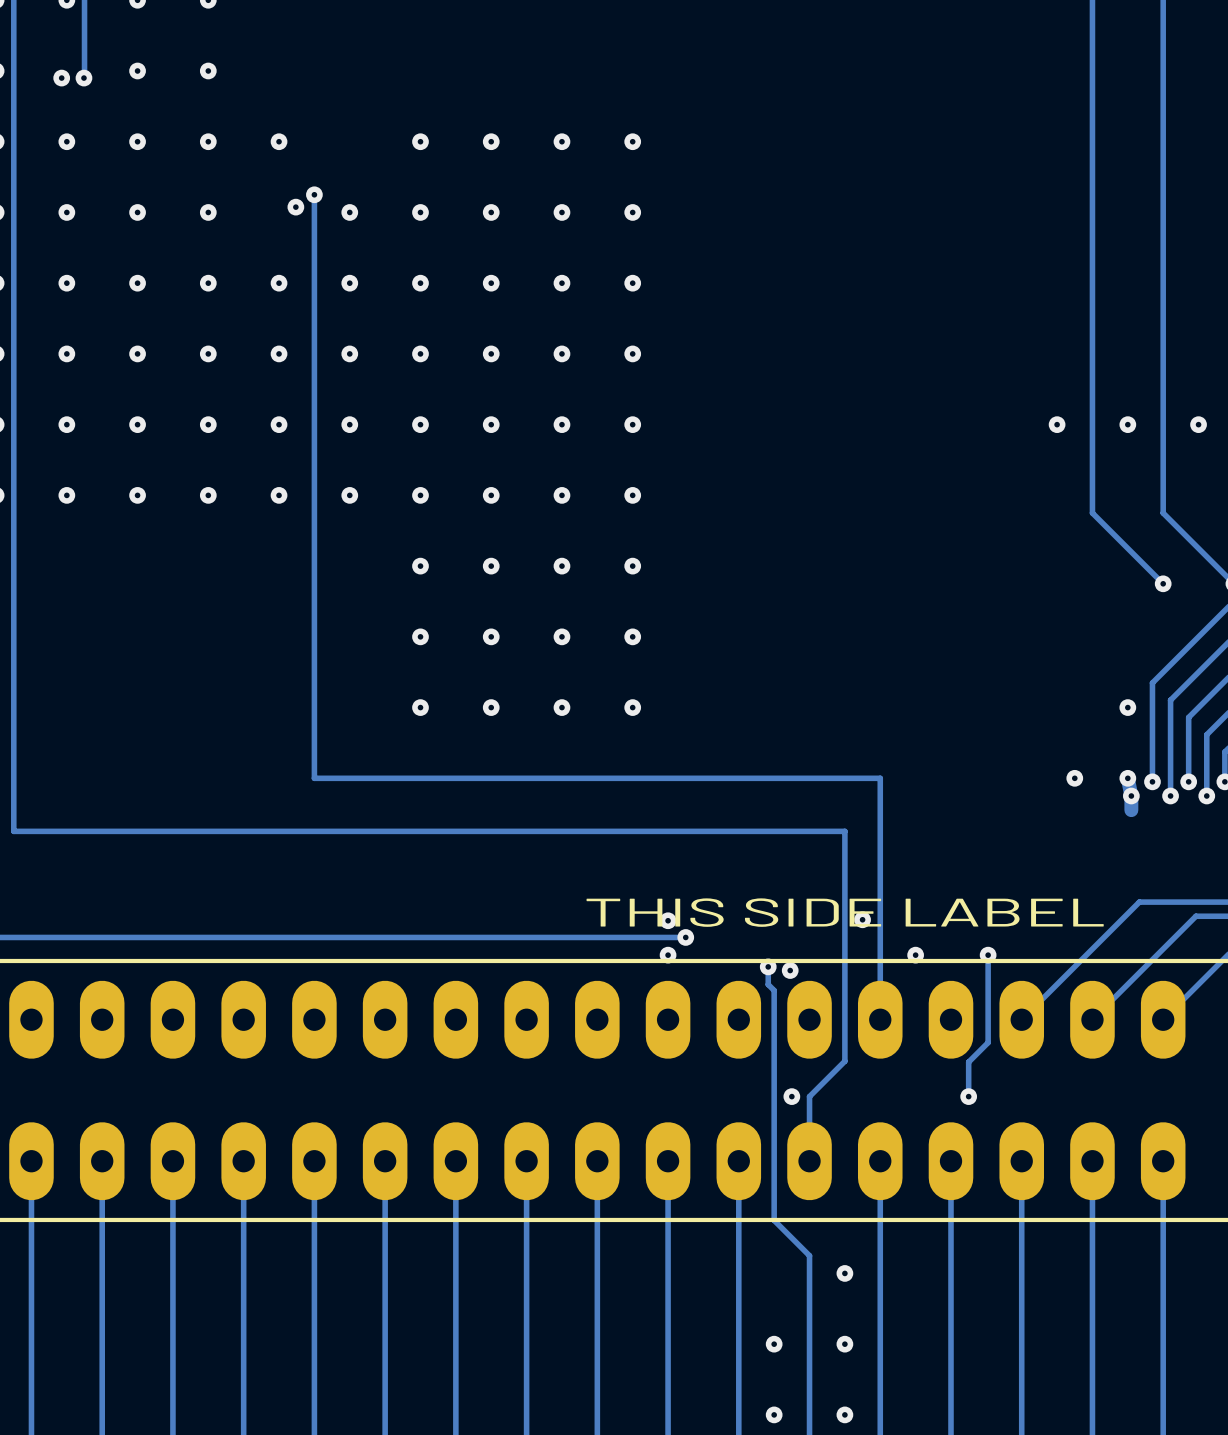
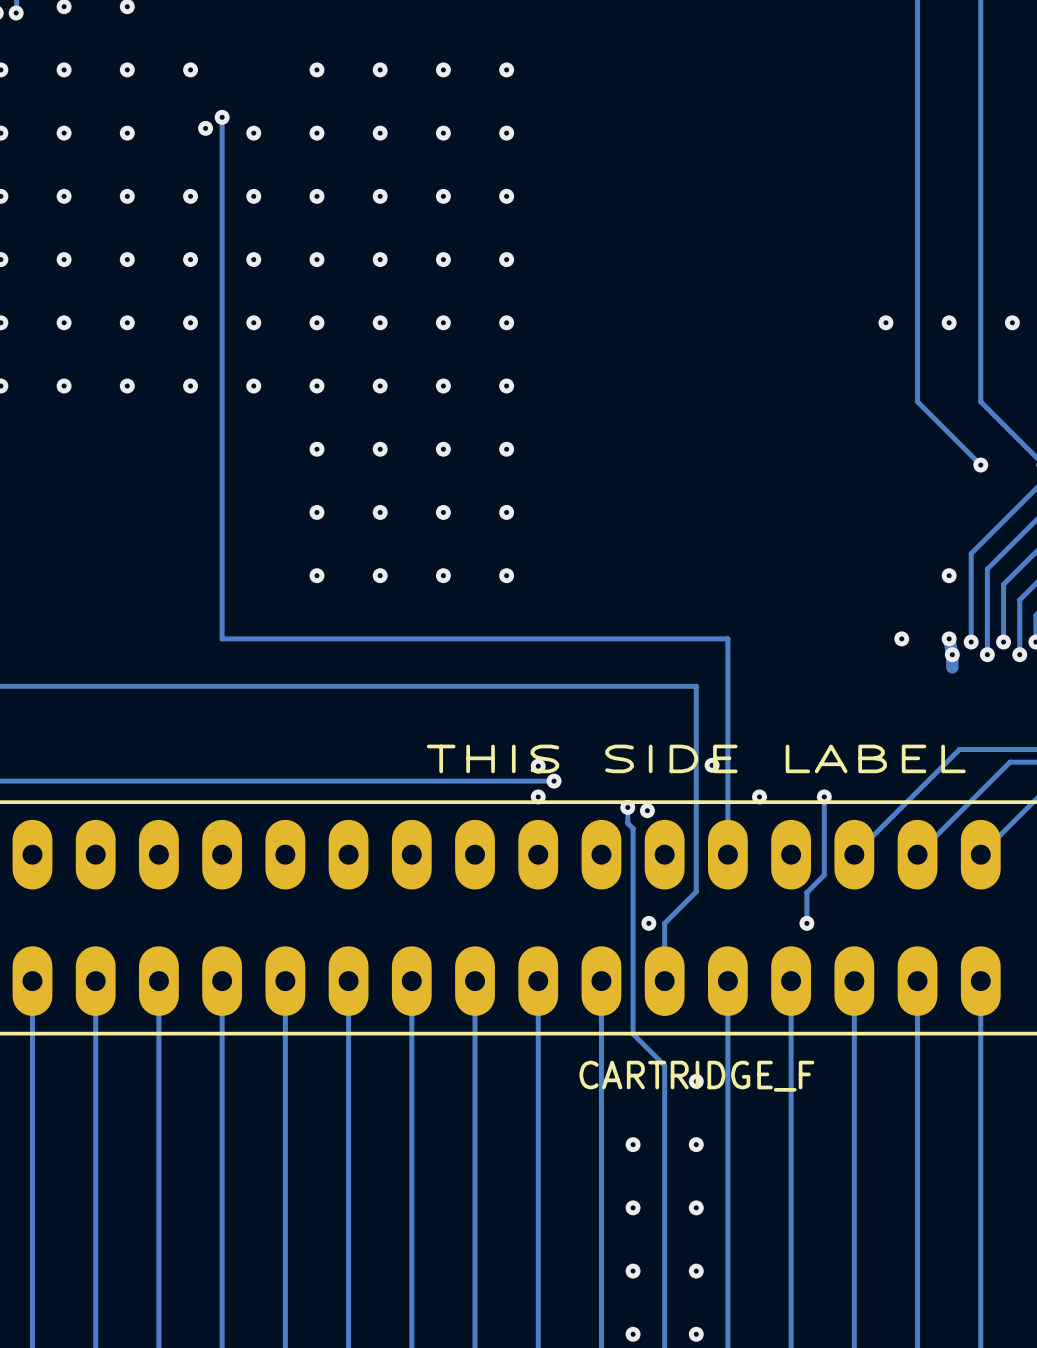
part value: none -> CARTRIDGE_F (696, 1076)

